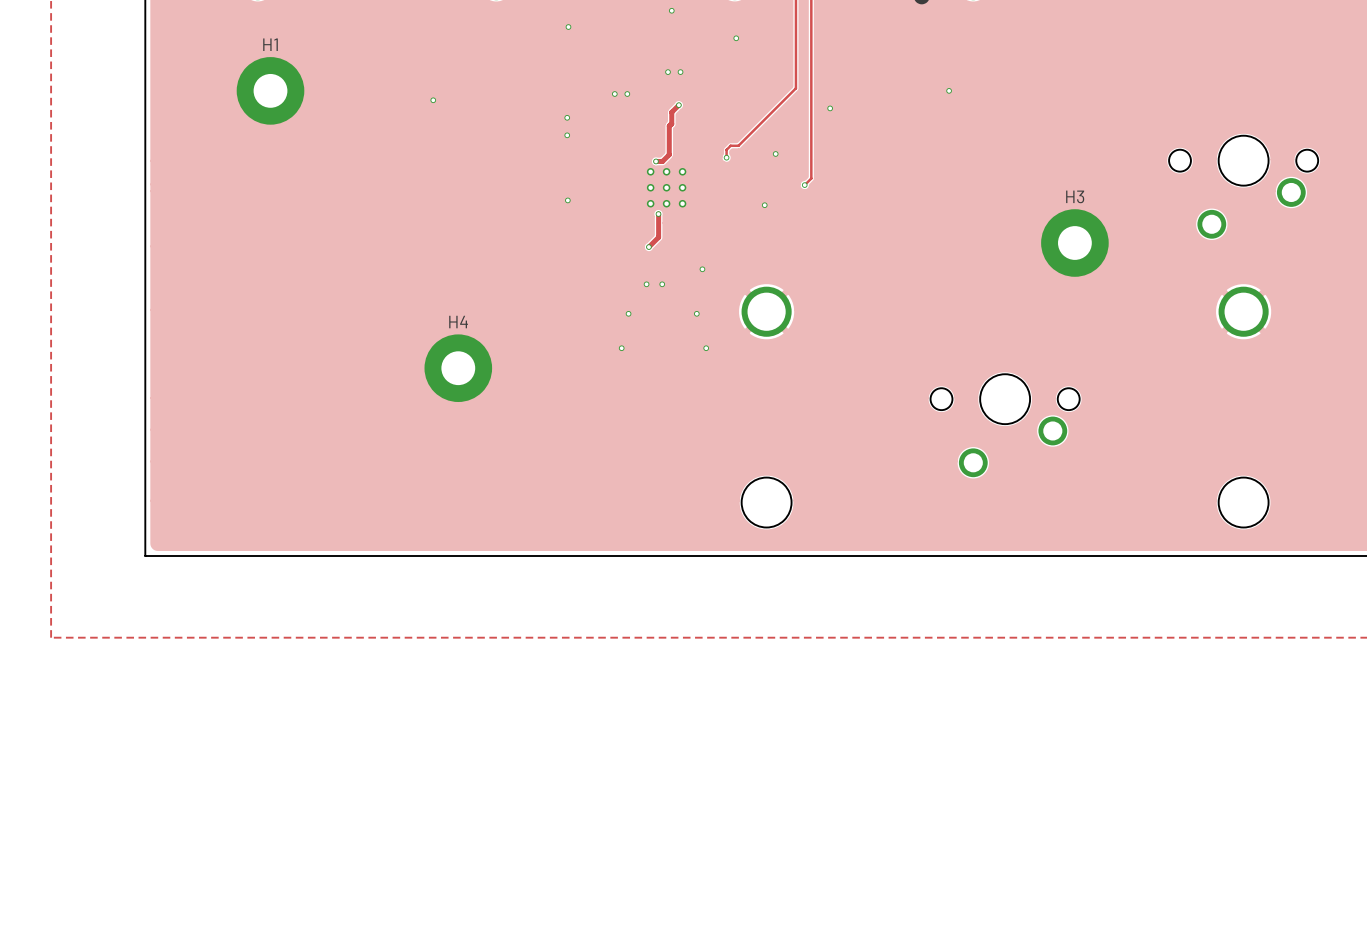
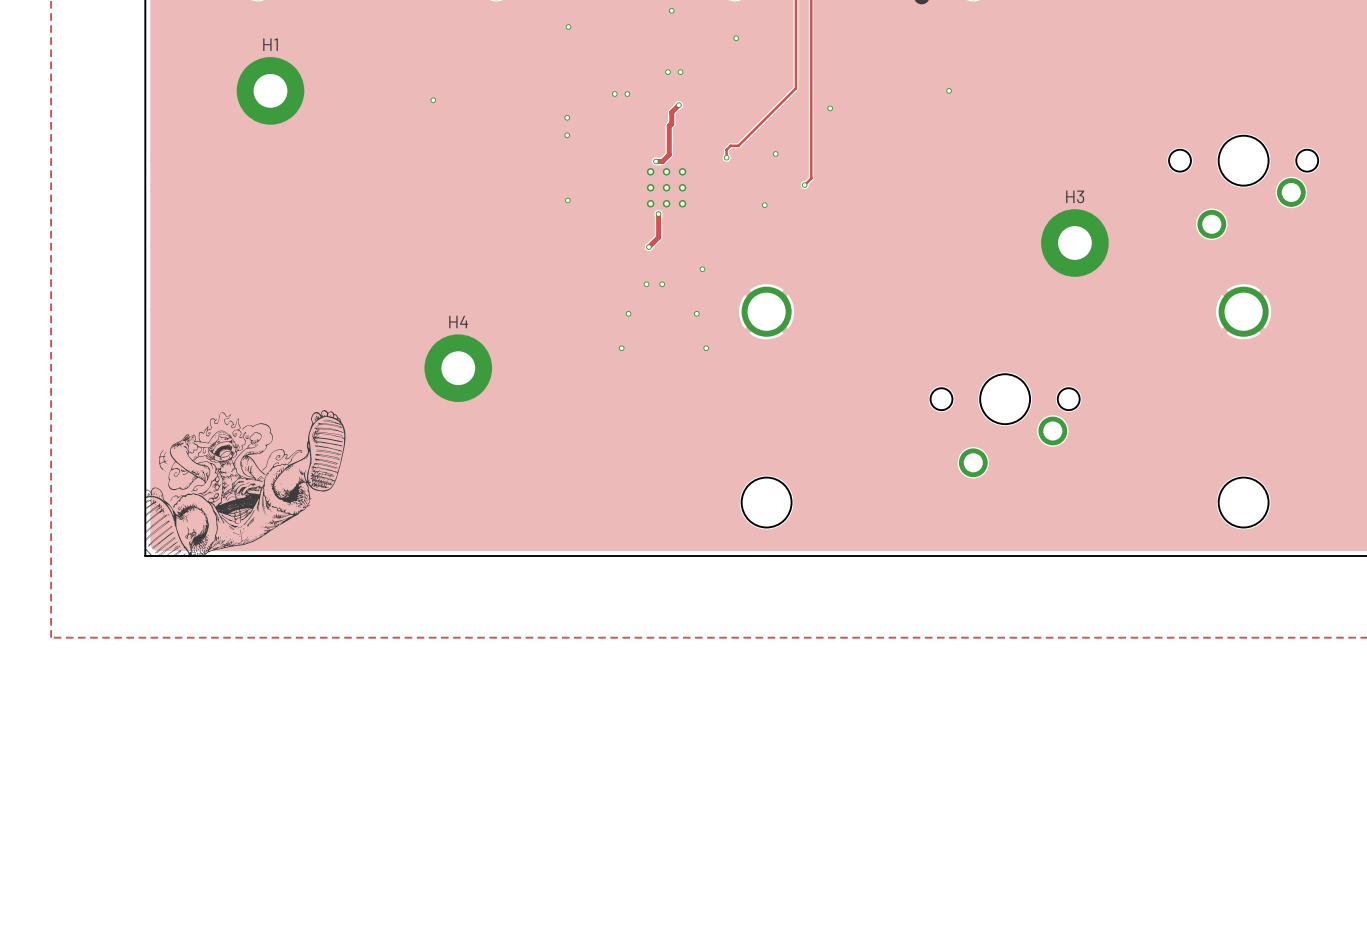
drawing: none -> [144, 407, 346, 557]

